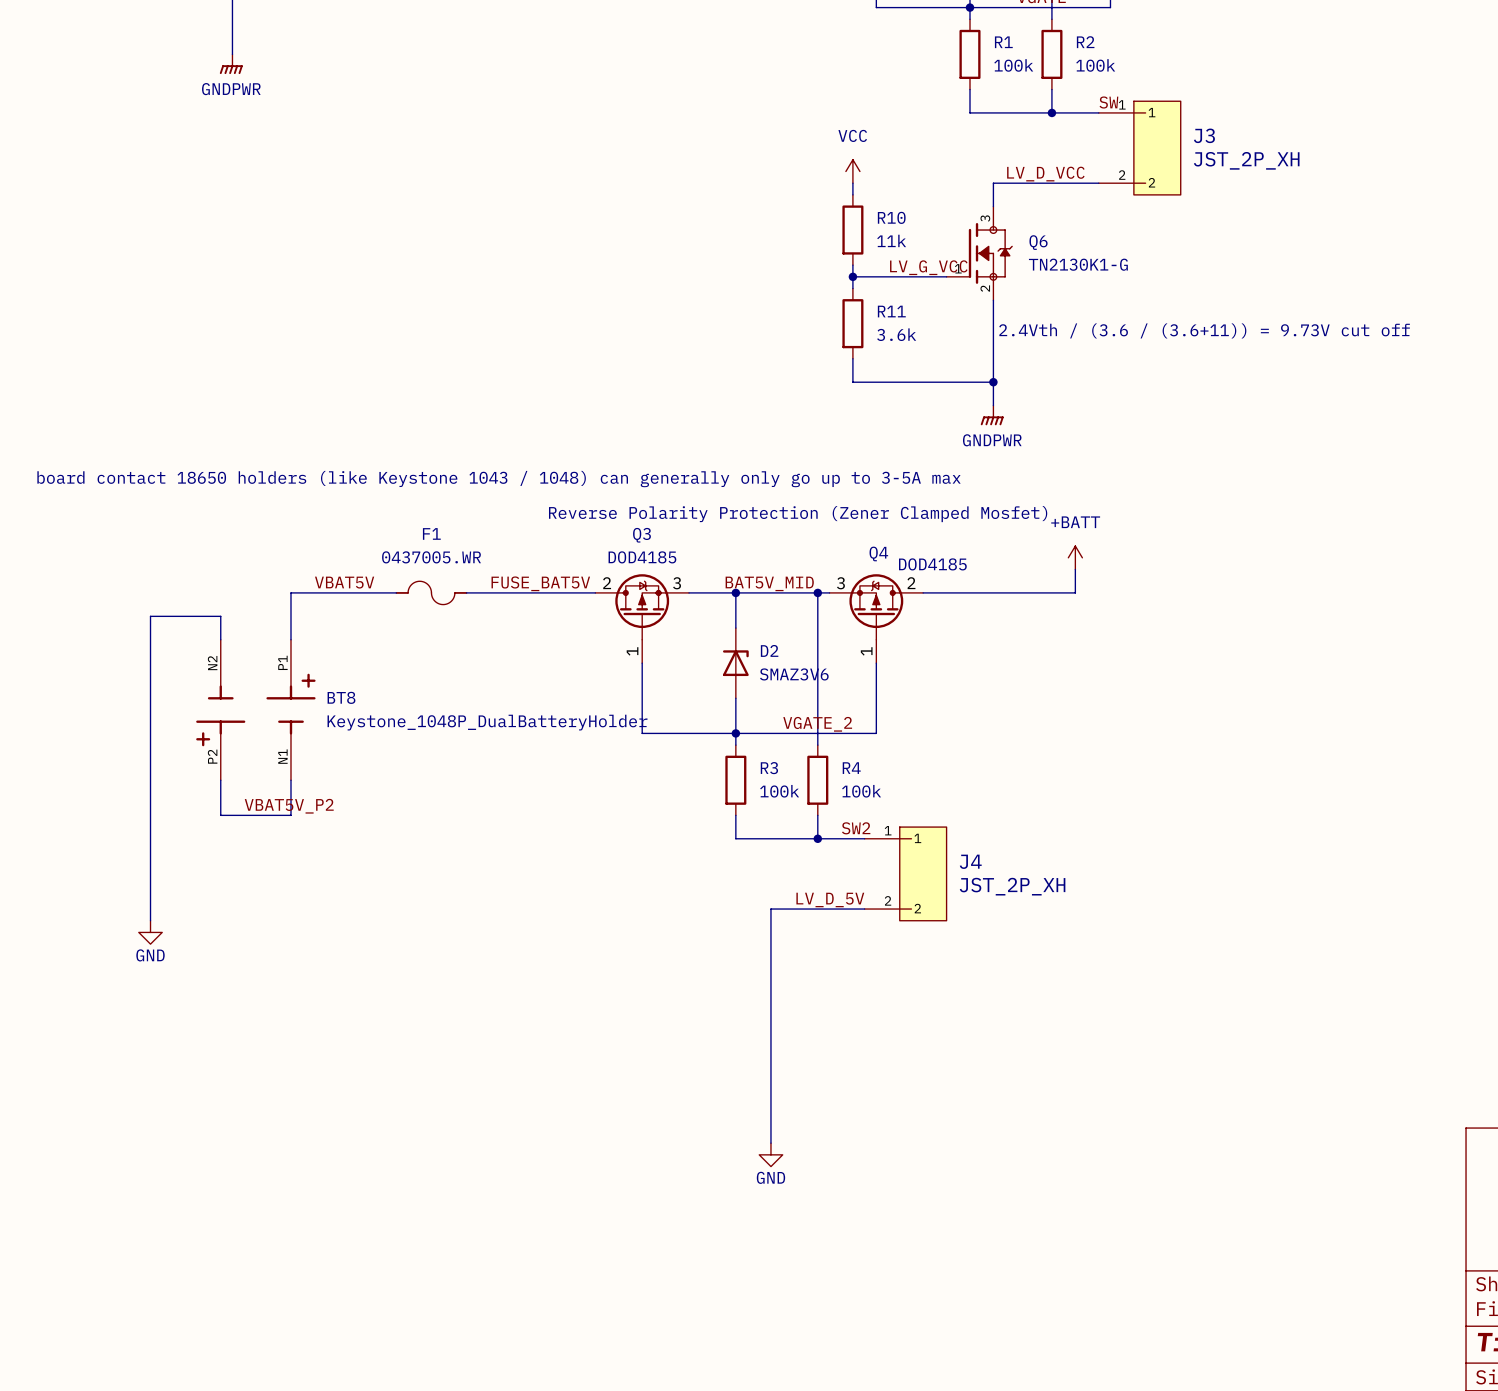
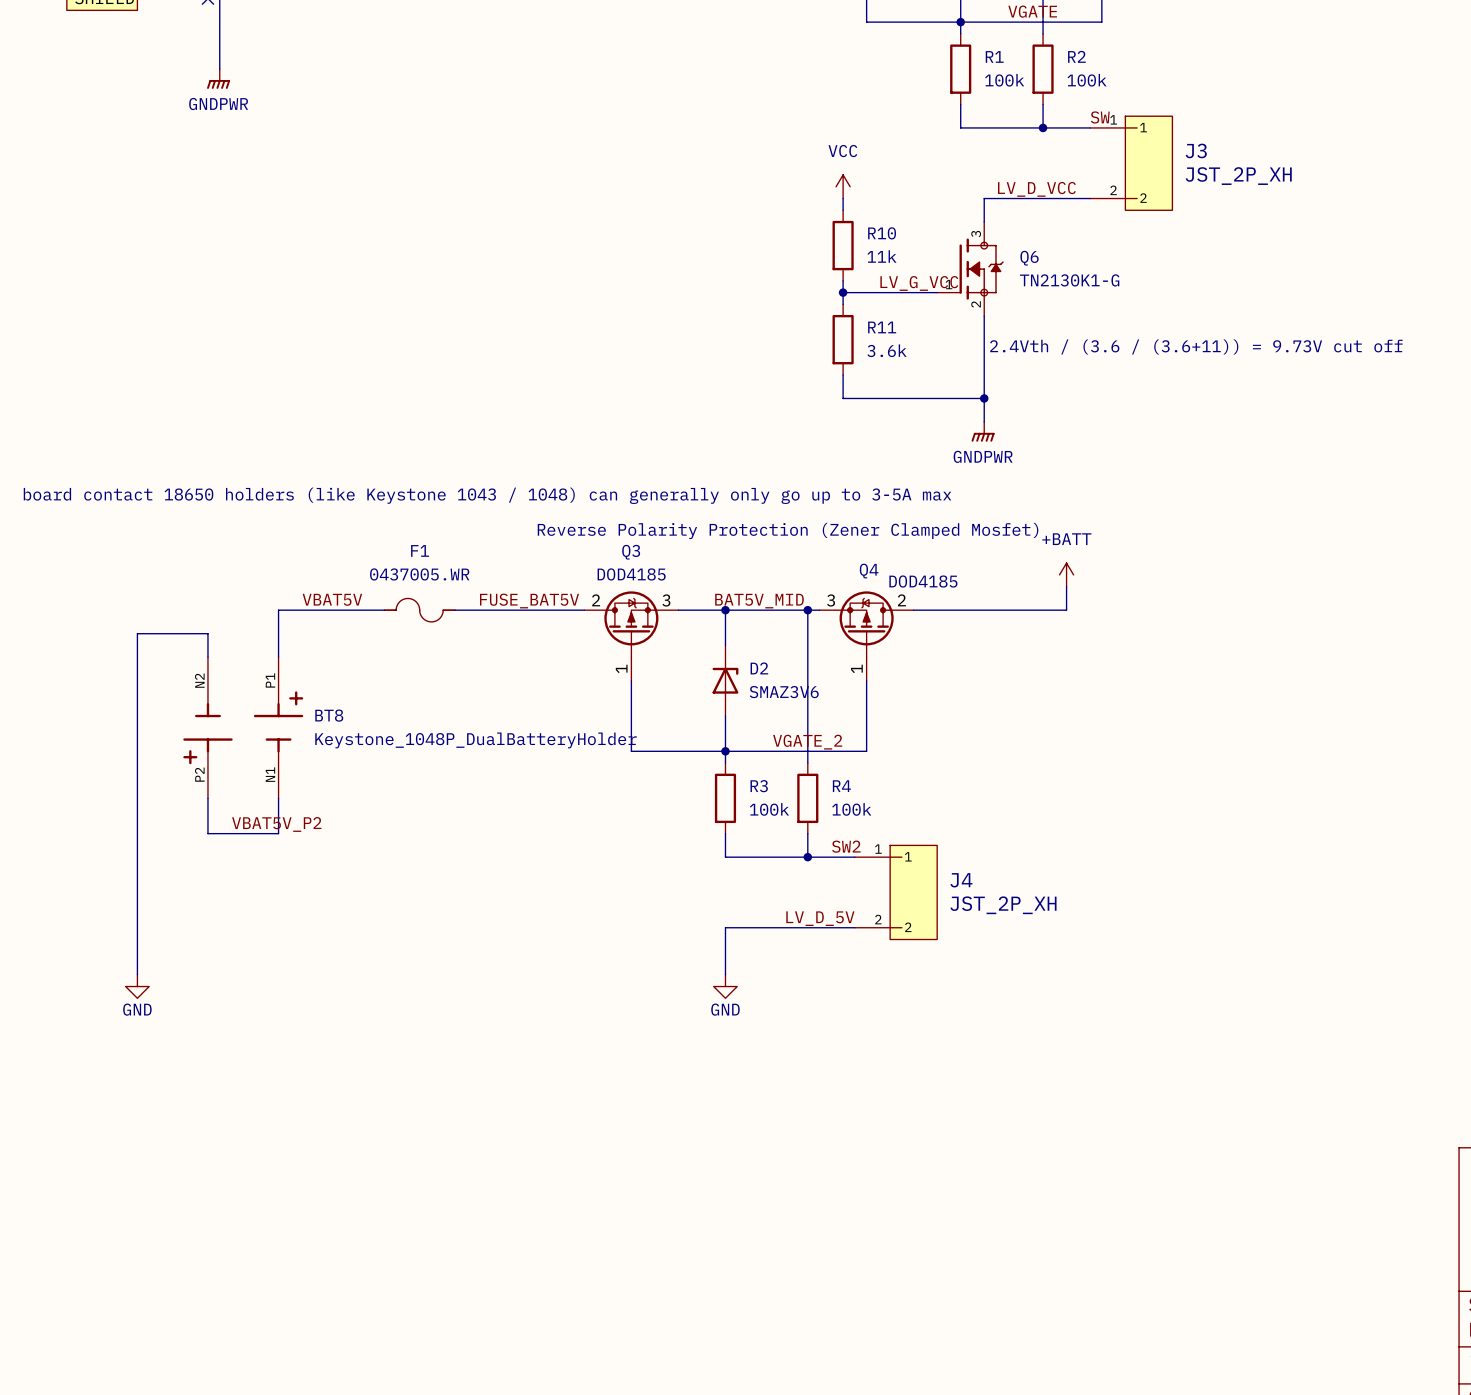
wire: (770, 909) (770, 1143) -> (760, 927) (725, 927) (725, 974)
wire: none -> (137, 939) (137, 974)
power symbol position: GND (150, 932) -> GND (137, 986)
power symbol position: GND (770, 1154) -> GND (725, 986)

